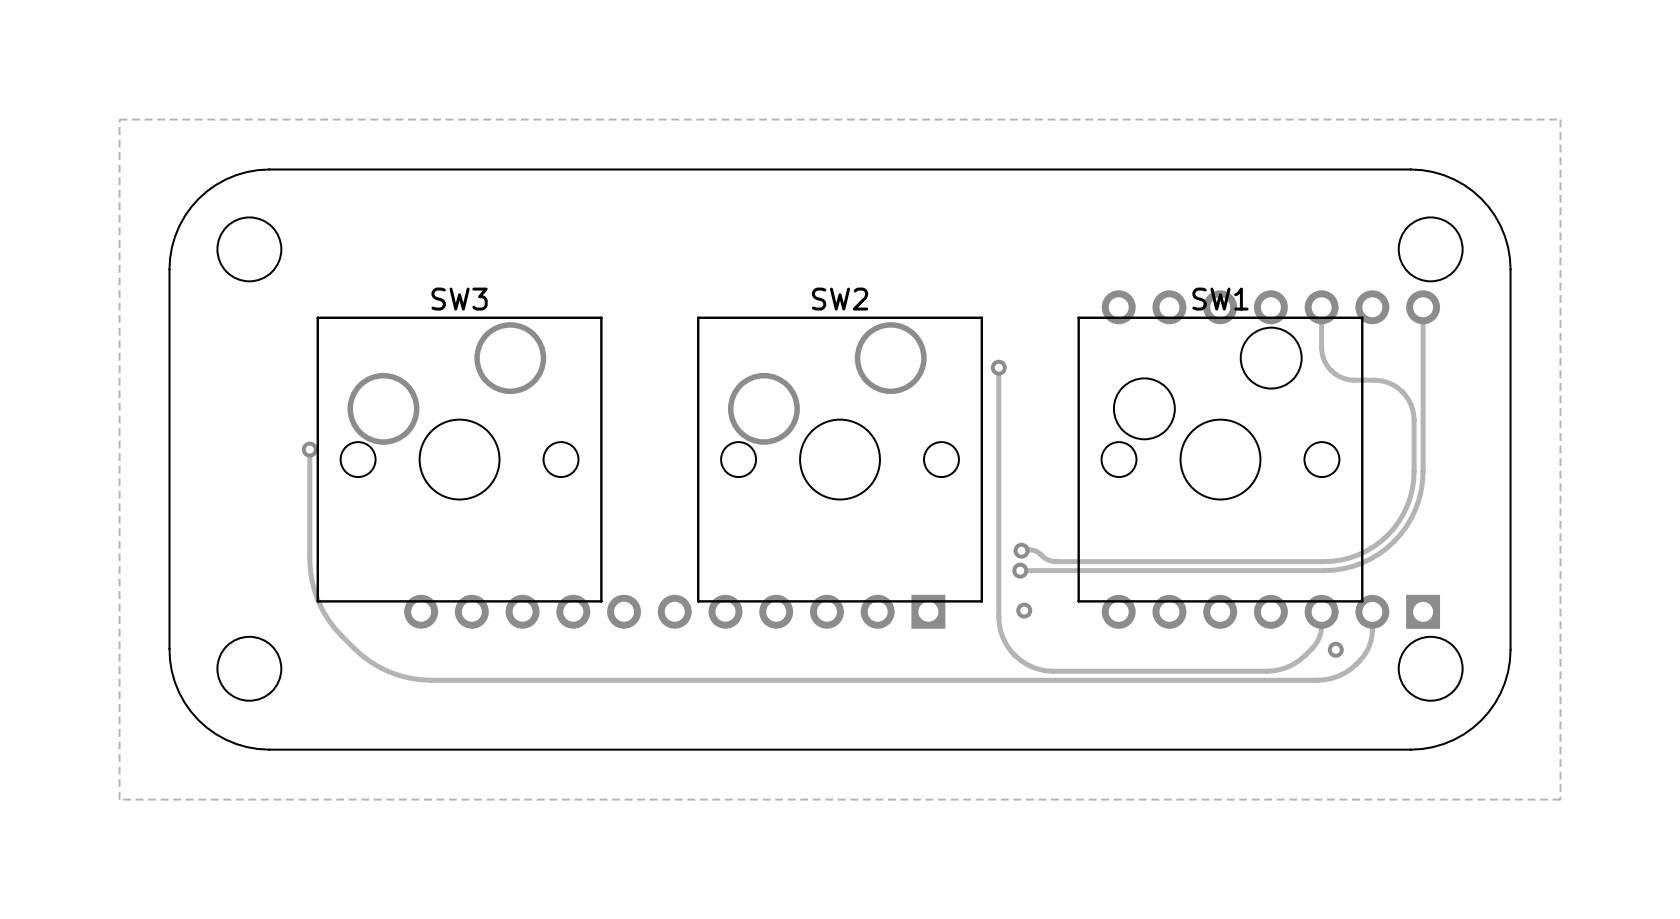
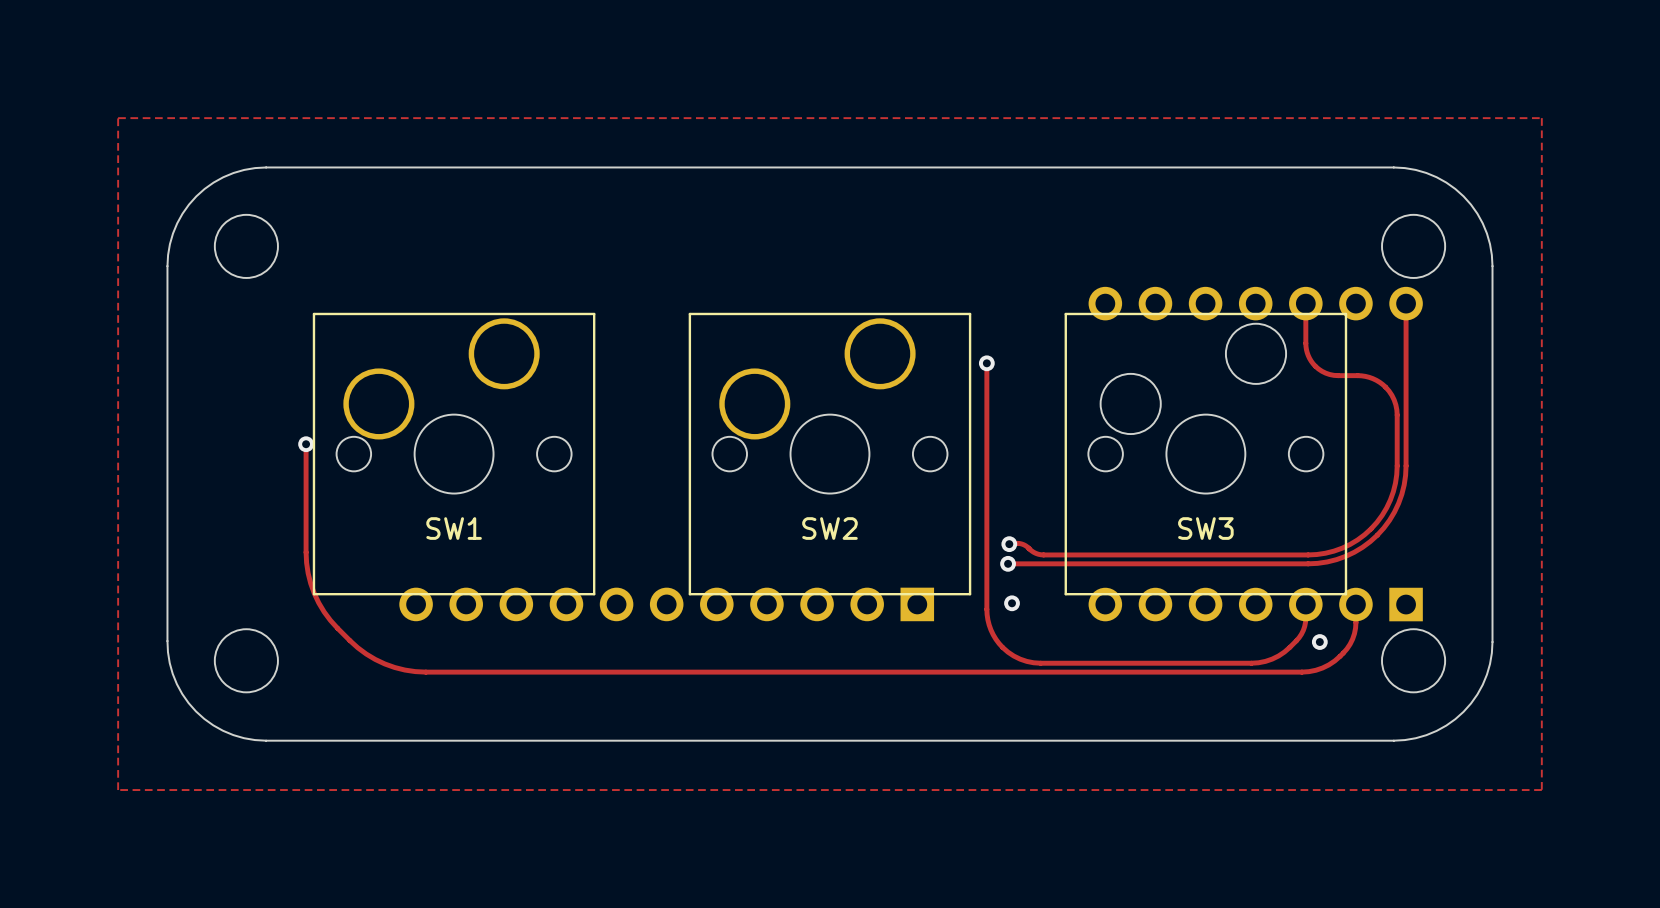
SW3 name: SW3 (459, 299) -> SW1 (454, 528)
SW2 name position: SW2 (840, 299) -> SW2 (829, 528)
SW1 name: SW1 (1220, 299) -> SW3 (1205, 528)

